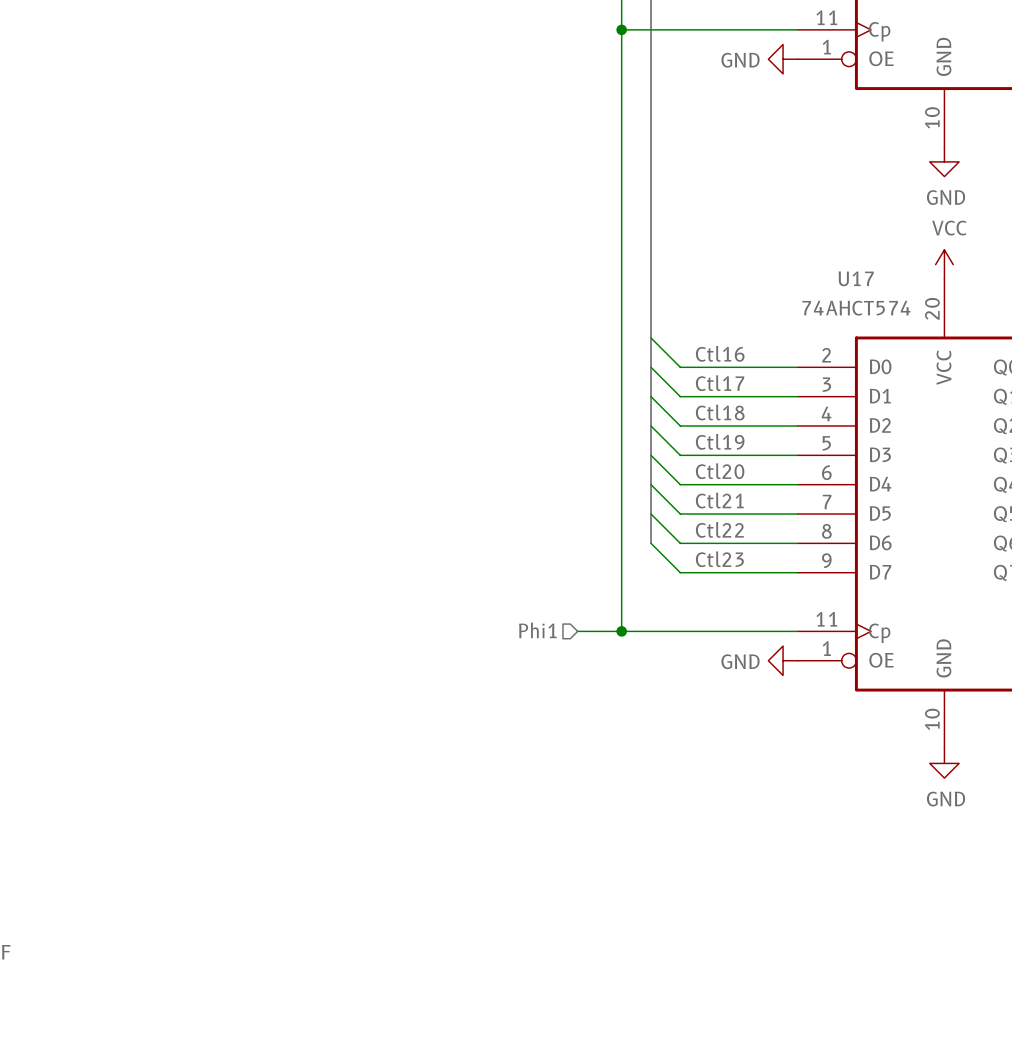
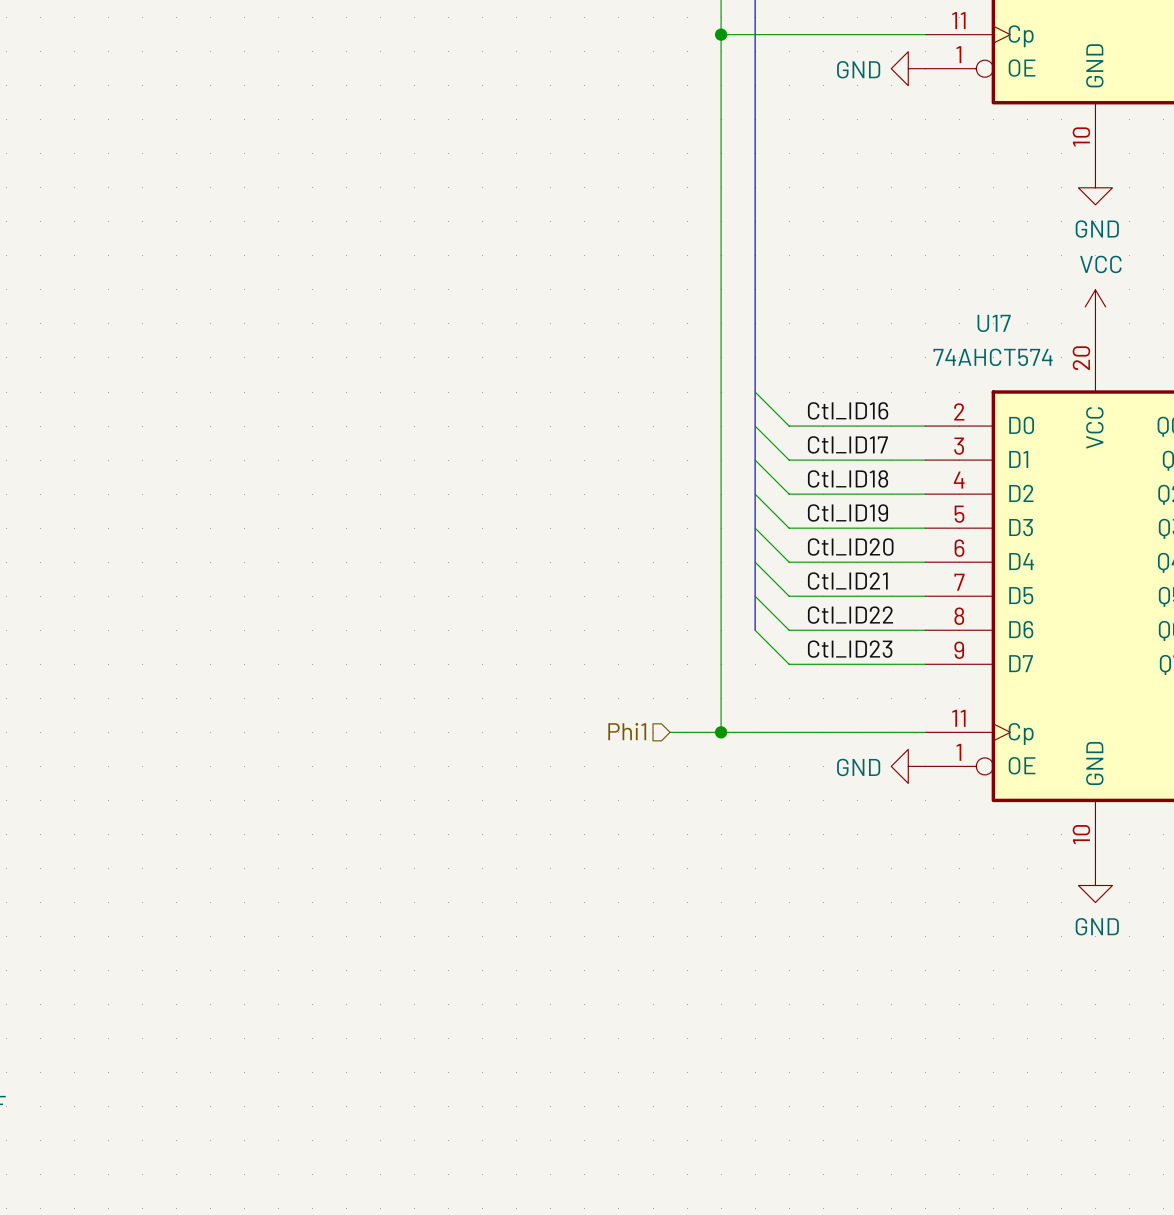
label: Ctl16 (720, 353) -> Ctl_ID16 (848, 410)
label: Ctl17 (720, 383) -> Ctl_ID17 (847, 444)
label: Ctl18 (720, 412) -> Ctl_ID18 (848, 478)
label: Ctl19 (720, 441) -> Ctl_ID19 (847, 512)
label: Ctl20 (720, 471) -> Ctl_ID20 (850, 547)
label: Ctl21 (719, 500) -> Ctl_ID21 (847, 581)
label: Ctl22 (719, 529) -> Ctl_ID22 (850, 615)
label: Ctl23 (719, 559) -> Ctl_ID23 (850, 649)

